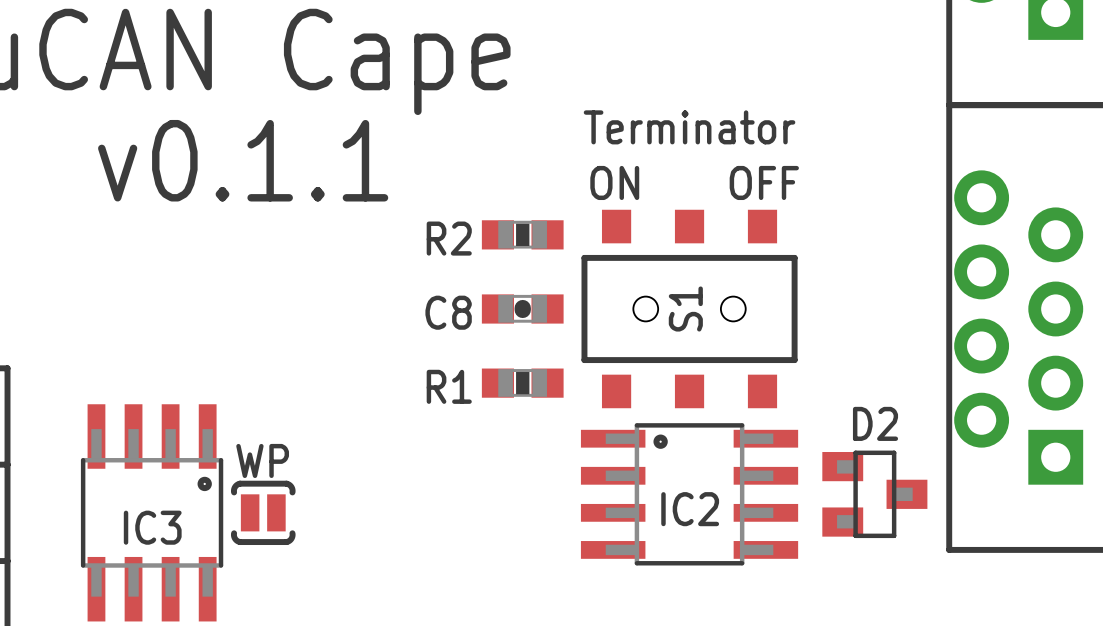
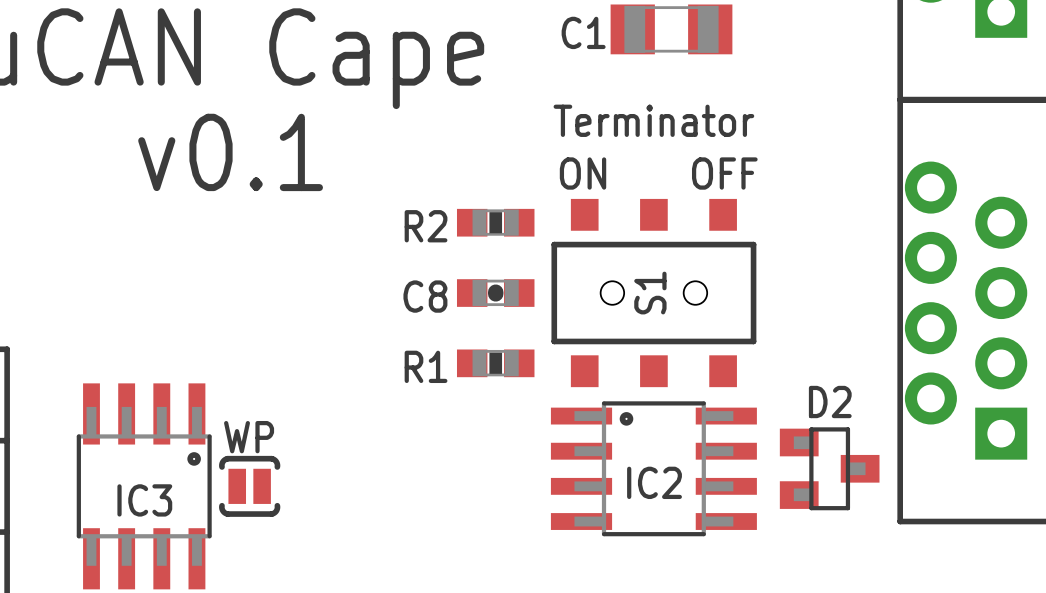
C1: none -> (671, 29)
text: v0.1.1 (243, 160) -> v0.1 (230, 152)

